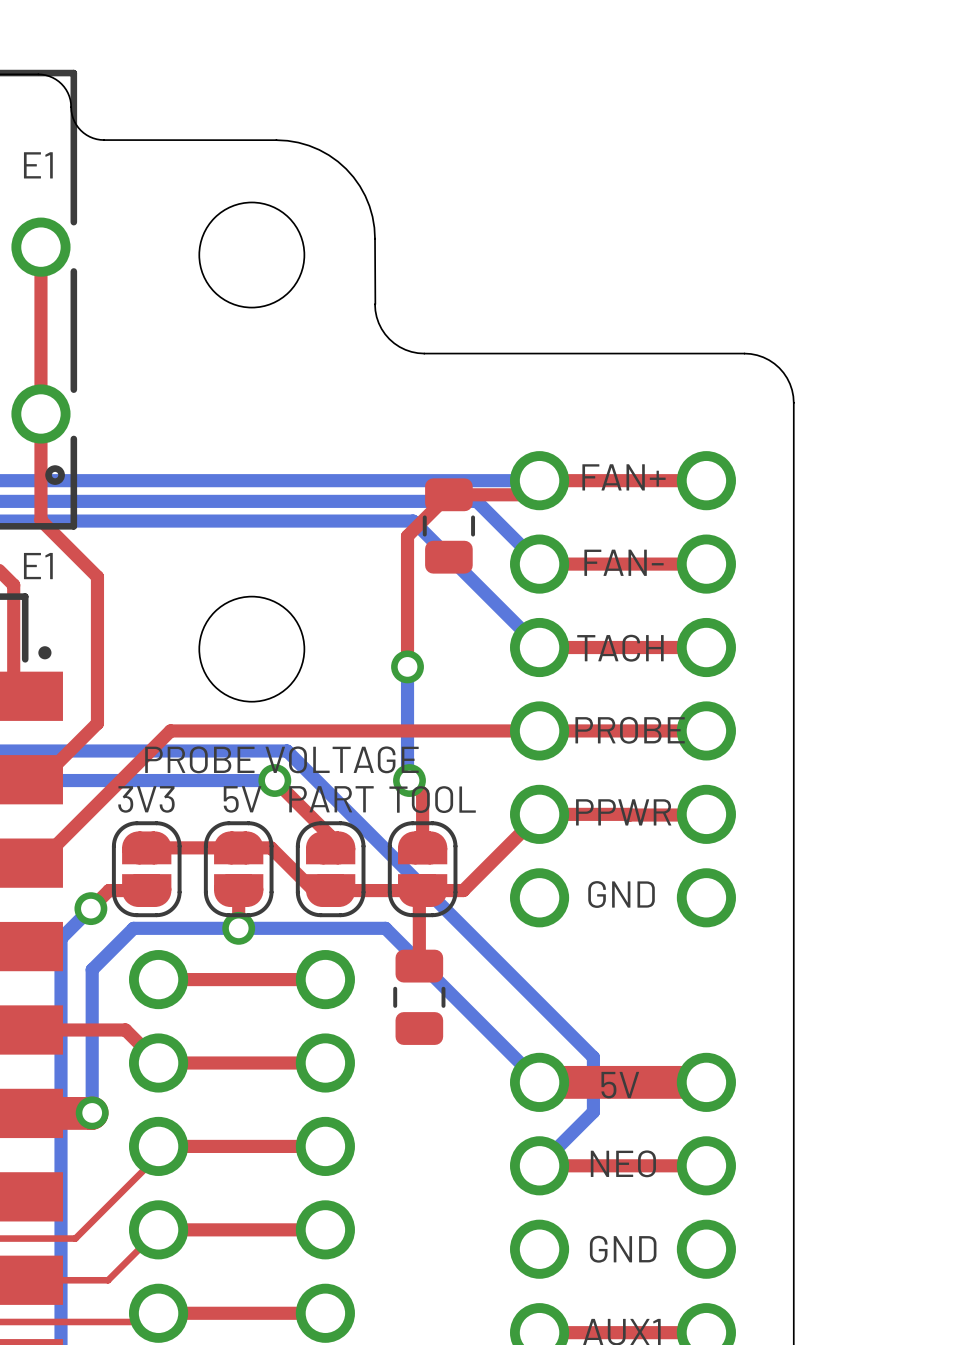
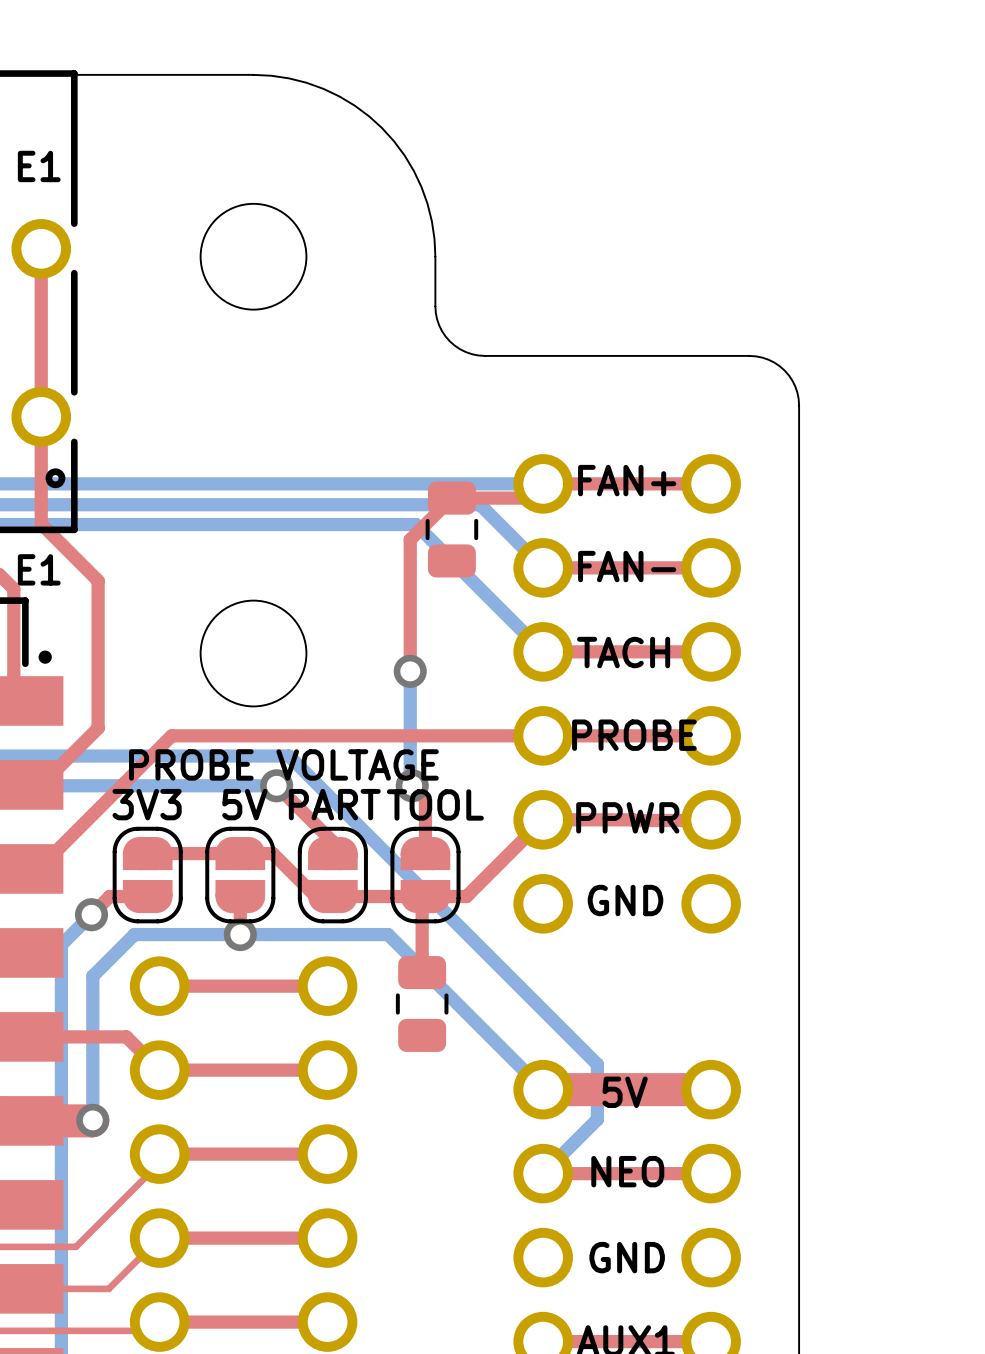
board edge: (38, 74) (49, 76) (61, 83) (69, 96) (72, 114) (76, 124) (86, 135) (96, 139) (287, 140) (309, 145) (328, 155) (353, 177) (369, 206) (374, 227) (375, 304) -> (38, 74) (271, 75) (306, 82) (323, 88) (354, 105) (368, 116) (394, 141) (413, 171) (421, 187) (431, 221) (434, 238) (435, 312) (442, 331) (449, 341) (460, 349) (472, 354) (484, 355)
board edge: (375, 304) (376, 317) (381, 328) (389, 339) (405, 349) (424, 353) (481, 353) -> none

